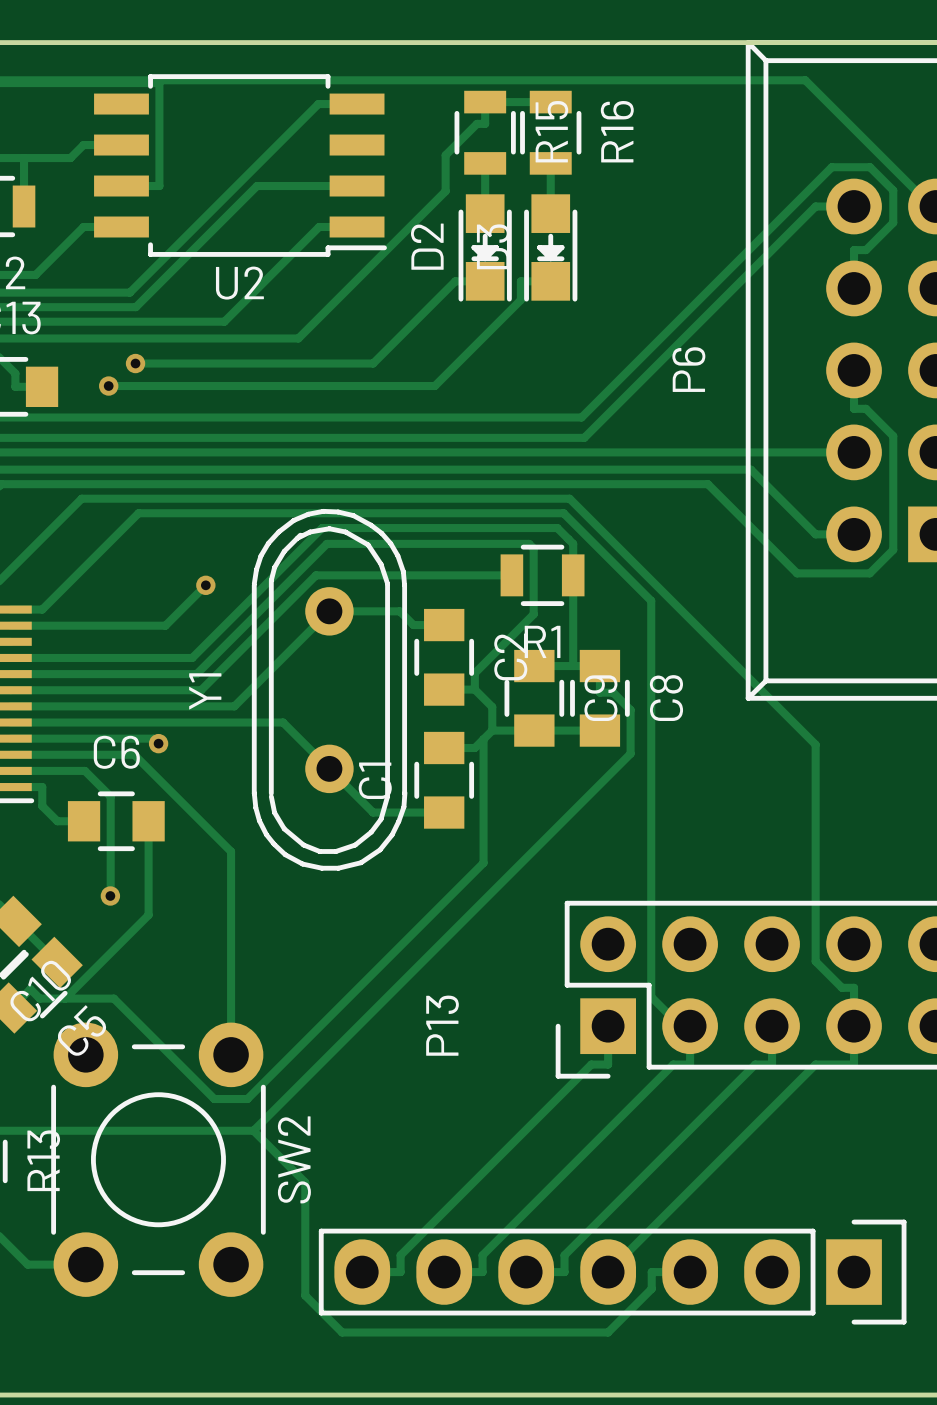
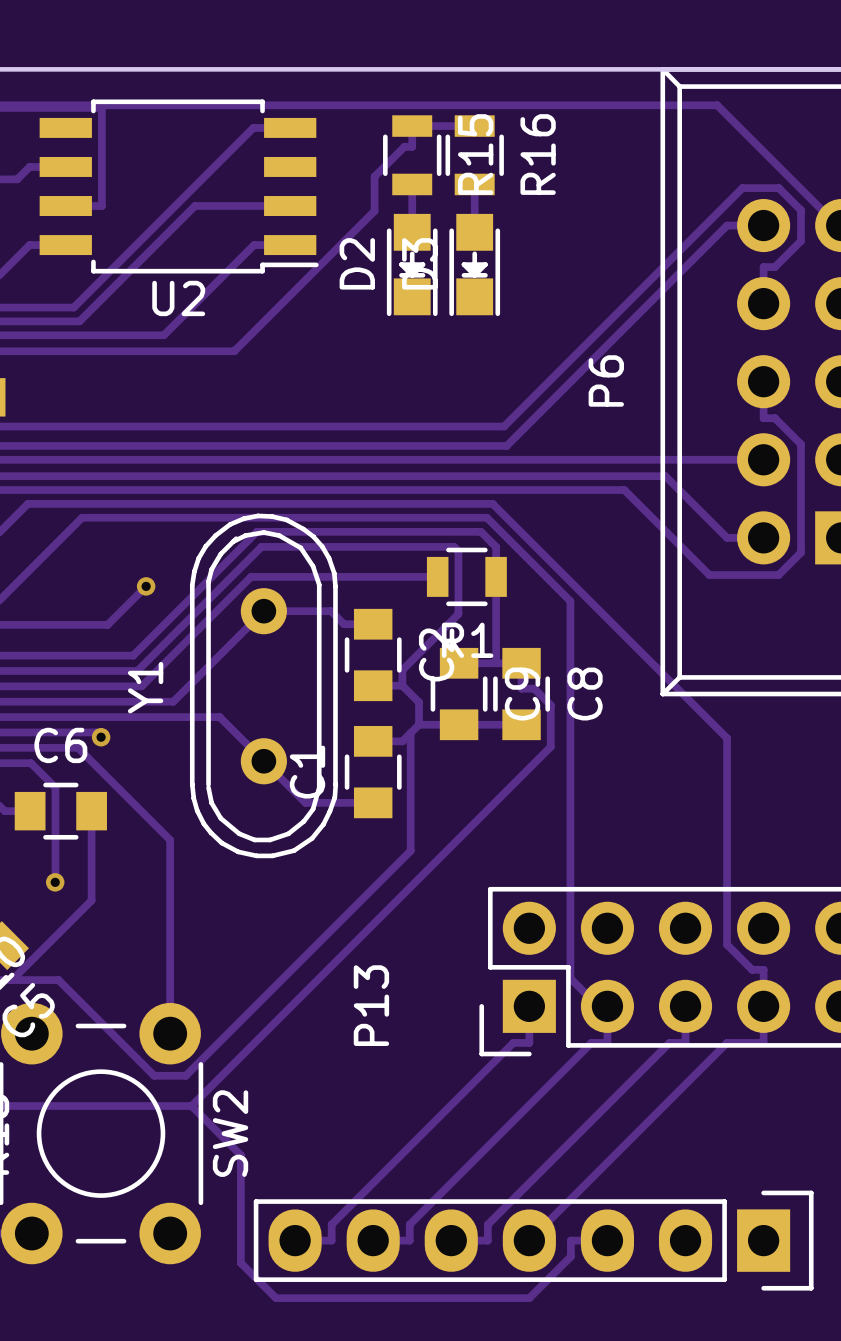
track: (485, 281) (455, 281) (373, 363) (135, 363) -> none
track: (550, 281) (520, 281) (520, 299) (434, 386) (108, 386) -> none
via: (135, 363) -> none
via: (108, 386) -> none

